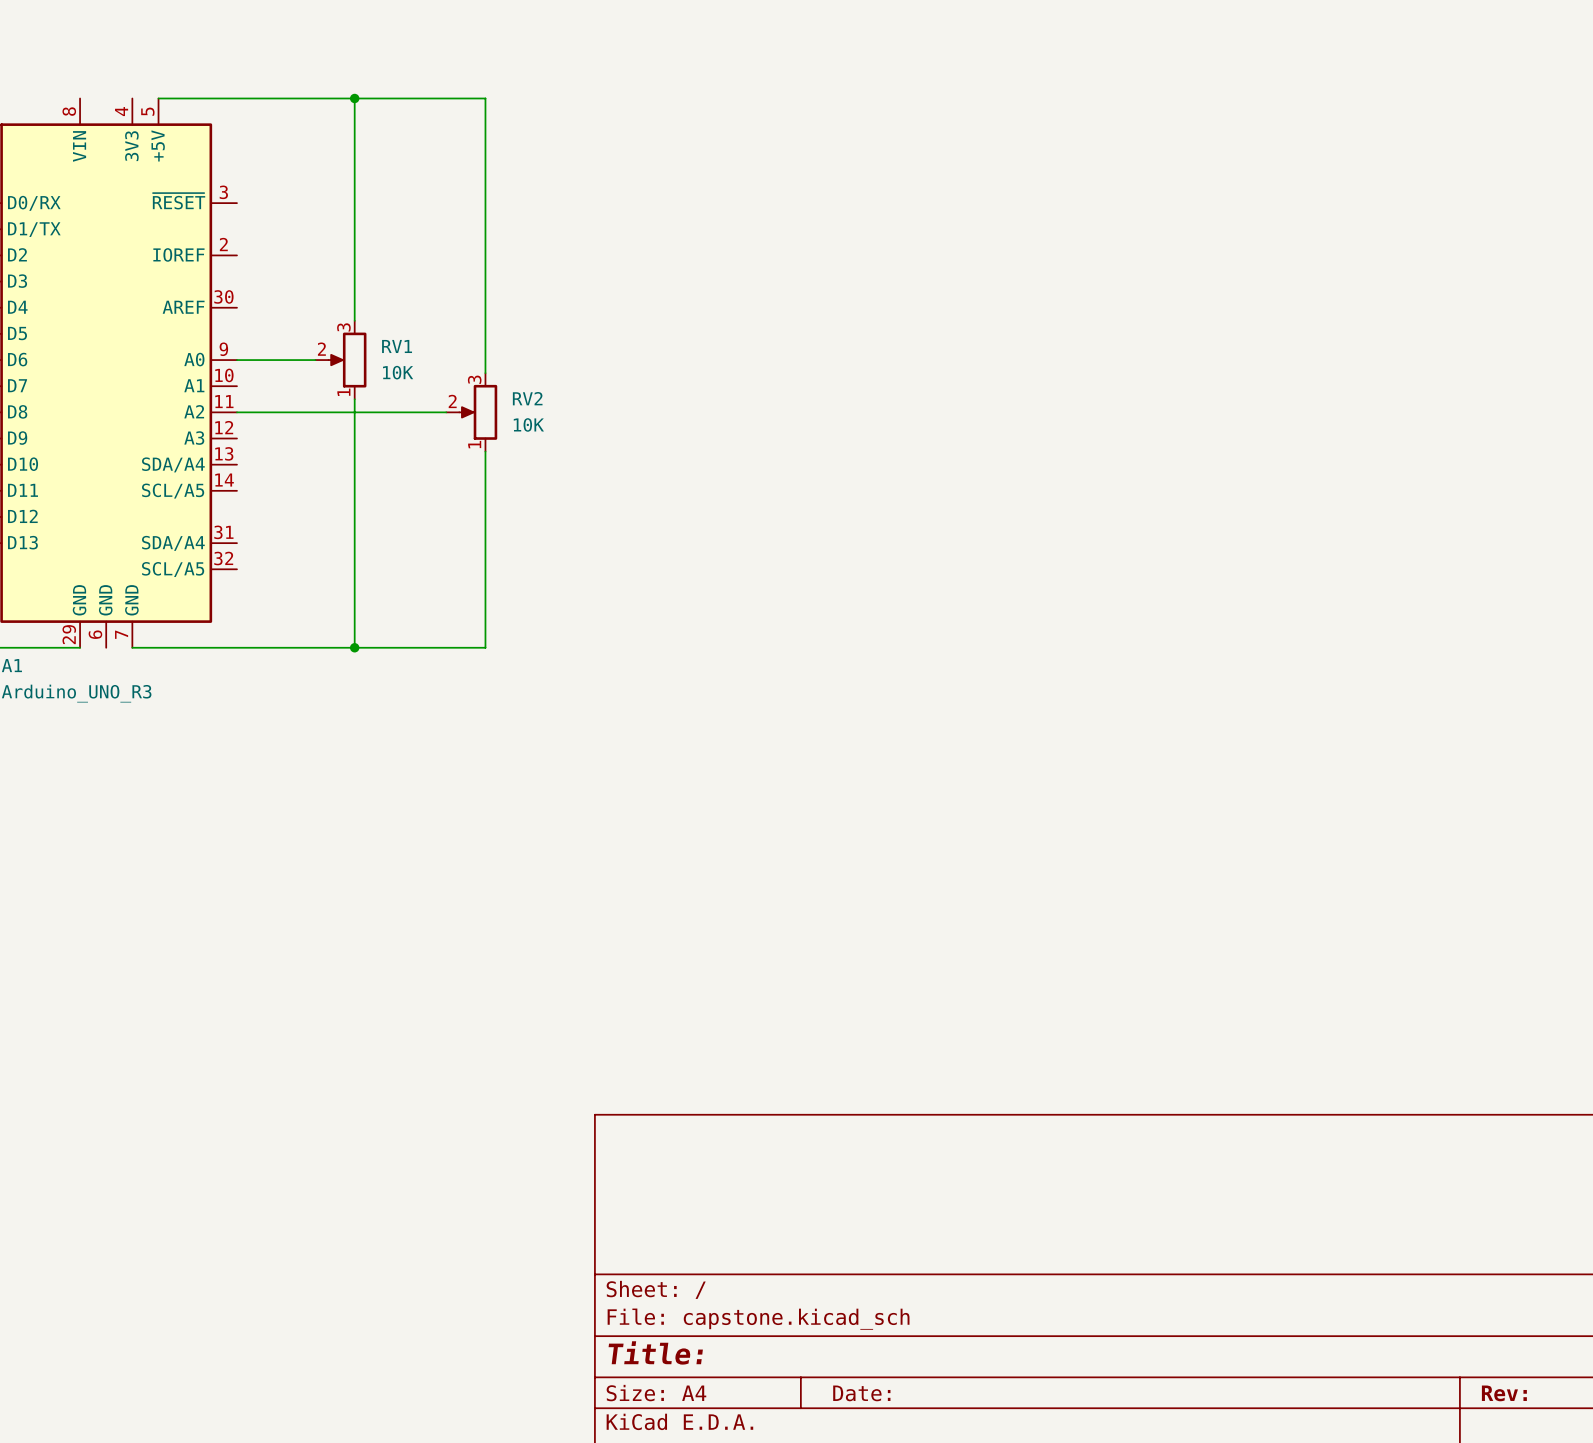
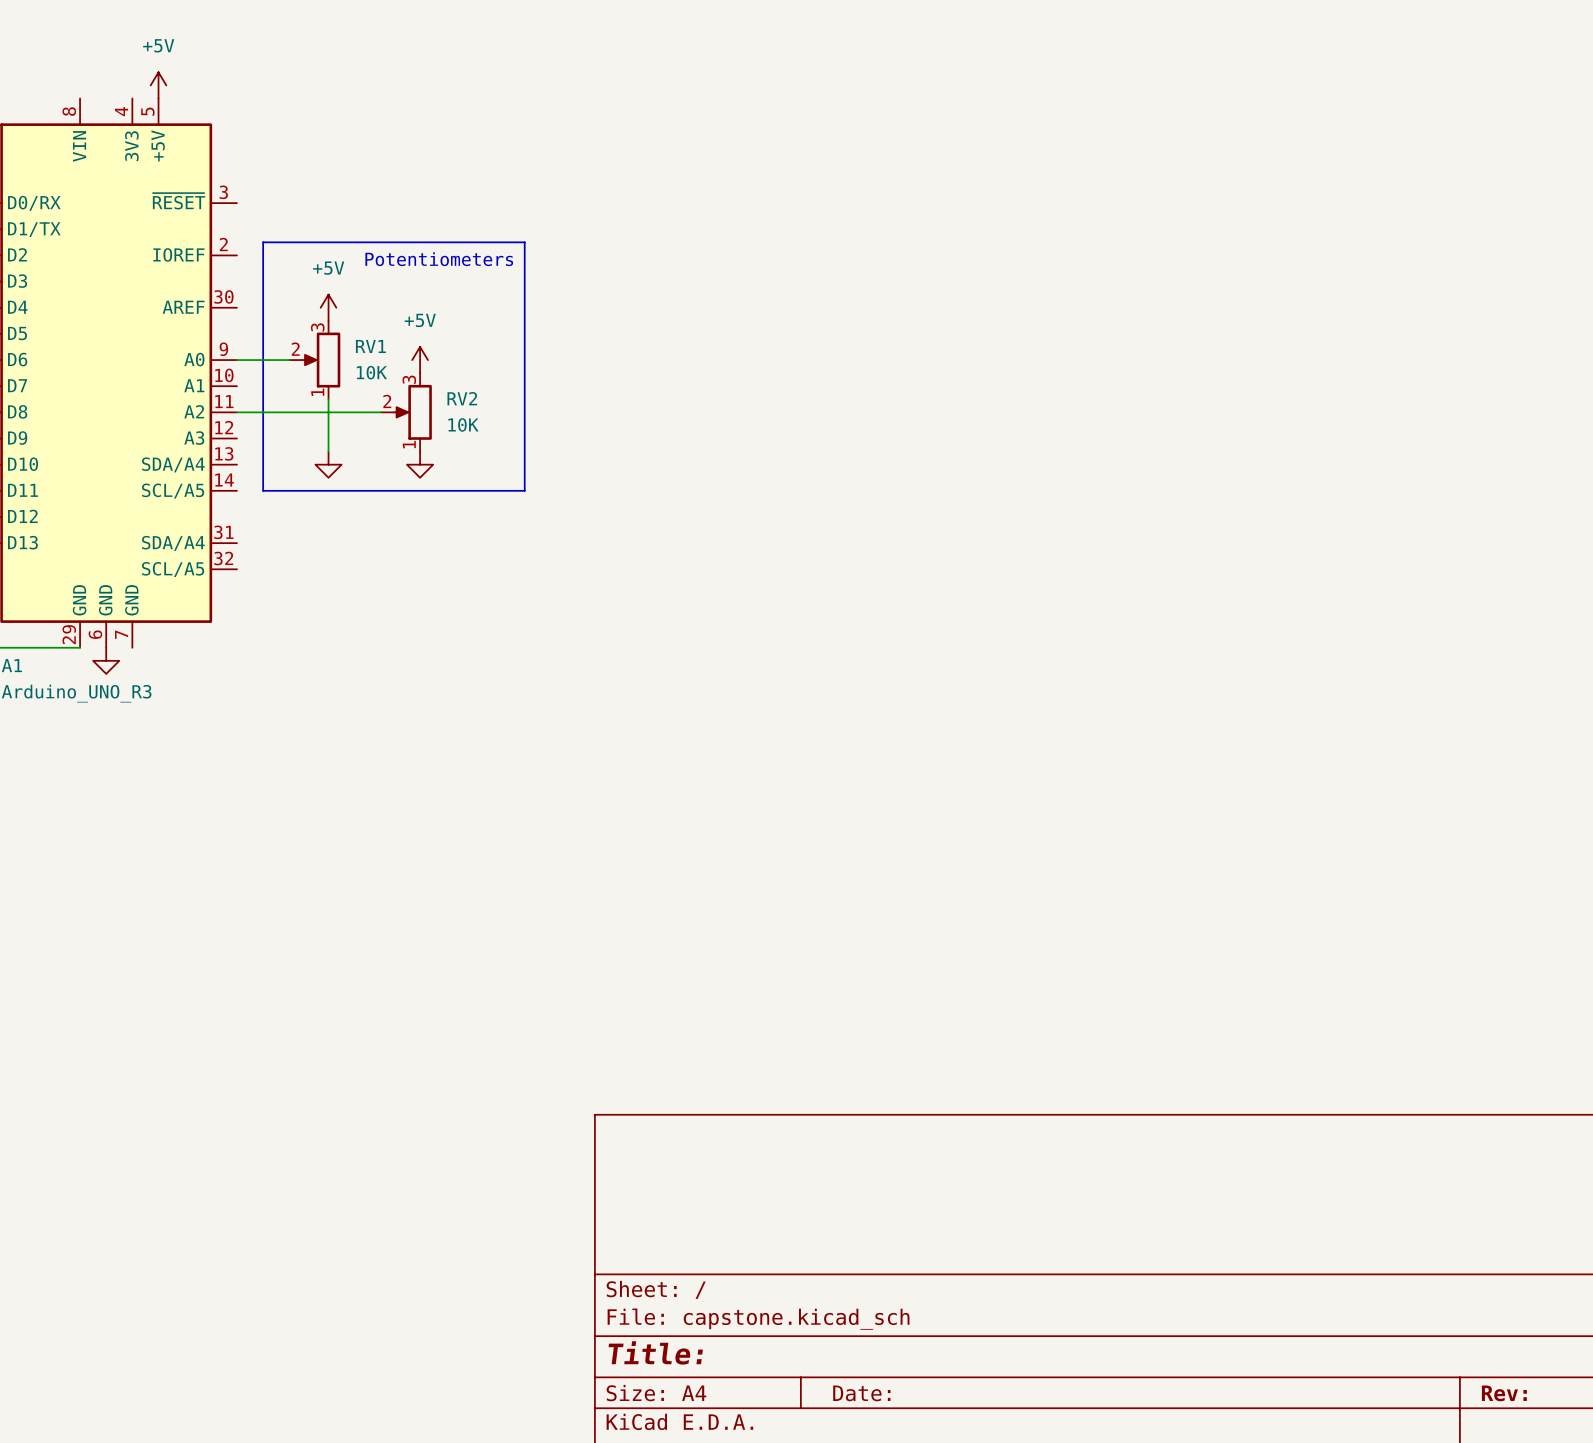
power symbol: none -> +5V (158, 85)
wire: (158, 98) (485, 98) (485, 373) -> none
wire: (354, 98) (354, 320) -> none
junction: (354, 98) -> none
line: none -> (263, 242) (524, 242) (524, 490) (263, 490) (263, 242)
text: none -> Potentiometers (439, 259)
power symbol: none -> +5V (328, 307)
RV1 position: (340, 360) -> (314, 360)
power symbol: none -> +5V (420, 360)
wire: none -> (328, 399) (328, 451)
wire: (354, 399) (354, 647) -> none
wire: (380, 412) (446, 412) -> none
RV2 position: (471, 412) -> (406, 412)
wire: (485, 451) (485, 647) (132, 647) -> none
power symbol: none -> (328, 464)
power symbol: none -> (420, 464)
junction: (354, 647) -> none
power symbol: none -> (106, 660)

